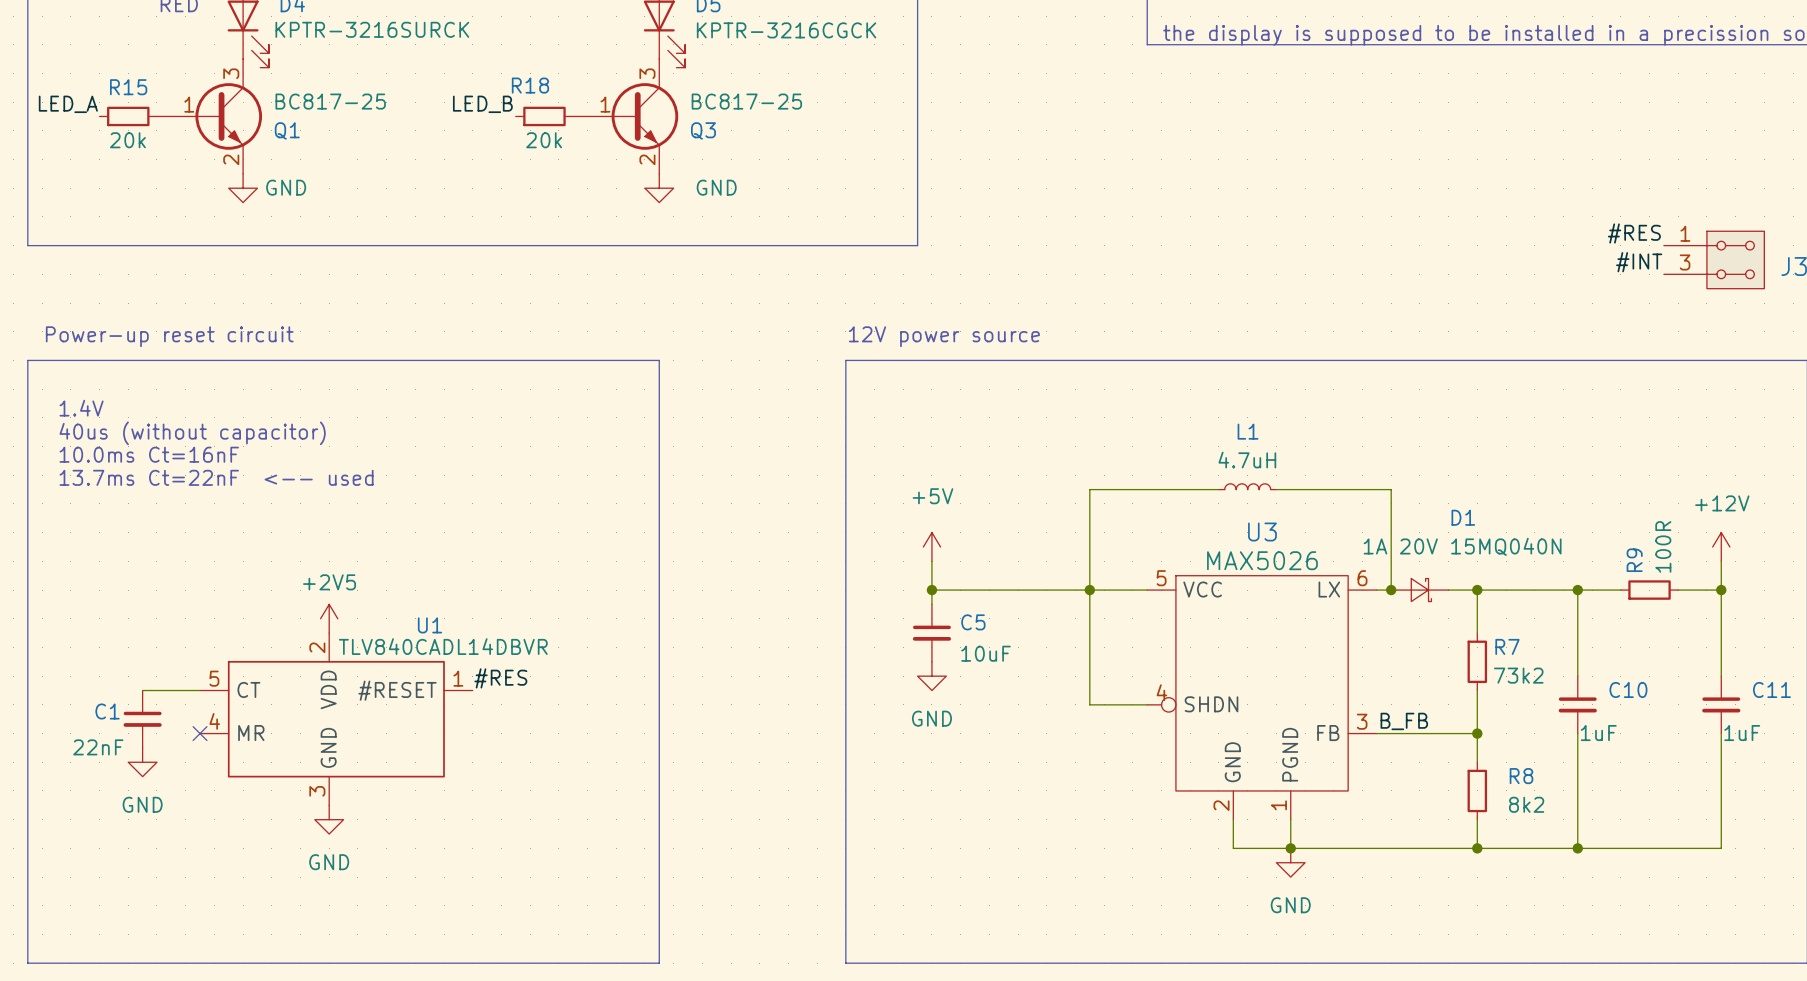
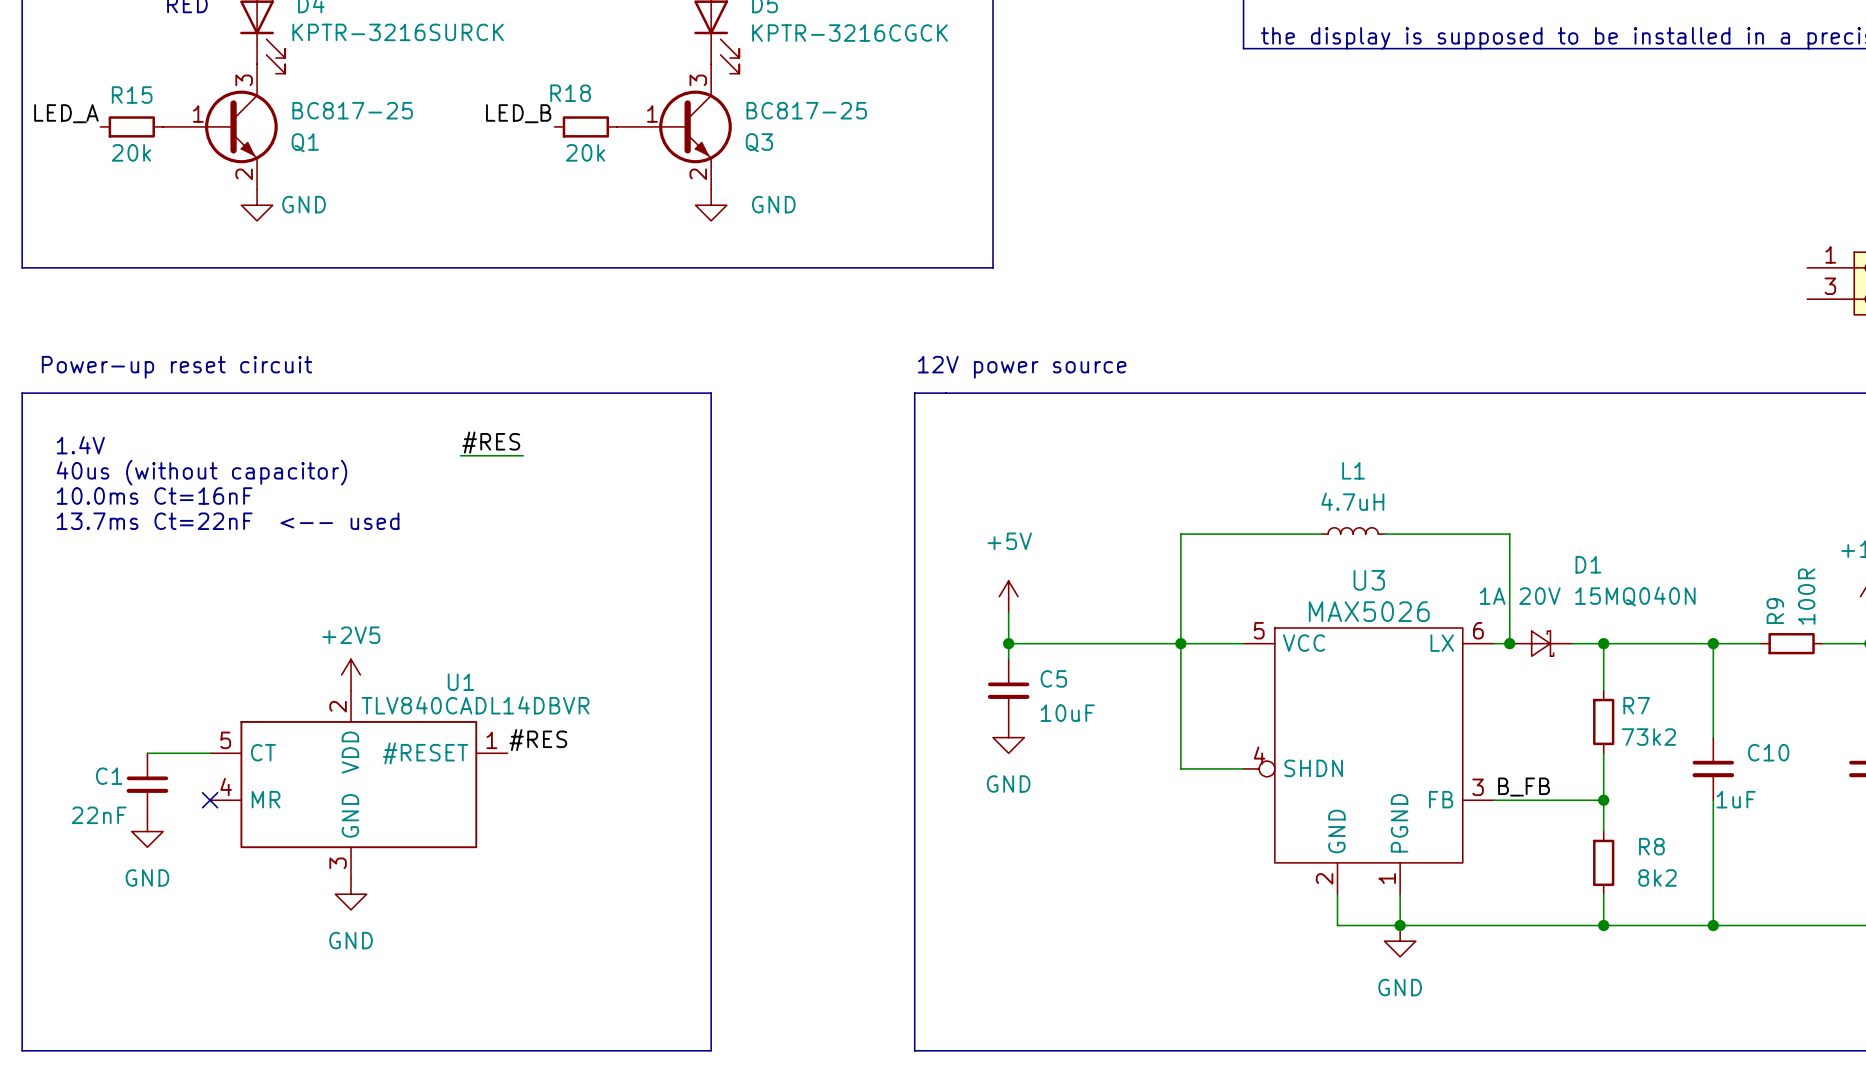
label: #RES (1634, 233) -> none
label: #INT (1639, 262) -> none
label: none -> #RES (491, 442)
wire: none -> (460, 455) (523, 455)

